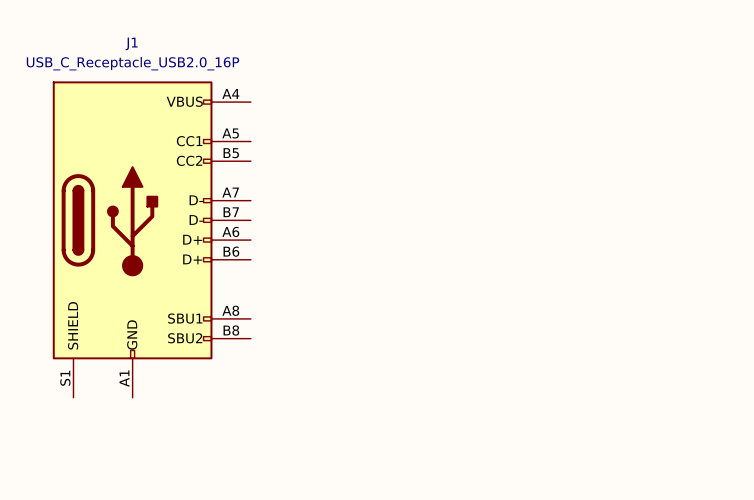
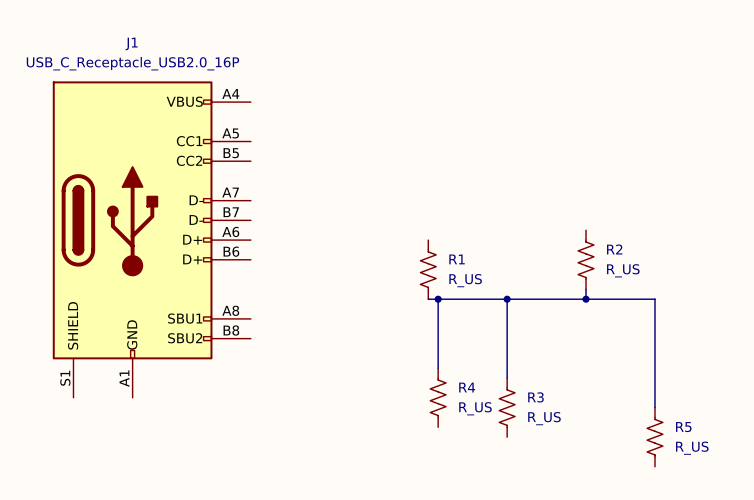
R2: none -> R_US (586, 259)
R1: none -> R_US (428, 269)
wire: none -> (586, 289) (586, 299)
wire: none -> (428, 299) (654, 299) (654, 407)
wire: none -> (438, 299) (438, 368)
junction: none -> (438, 299)
wire: none -> (507, 299) (507, 378)
junction: none -> (507, 299)
junction: none -> (586, 299)
R4: none -> R_US (438, 397)
R3: none -> R_US (507, 407)
R5: none -> R_US (654, 437)

